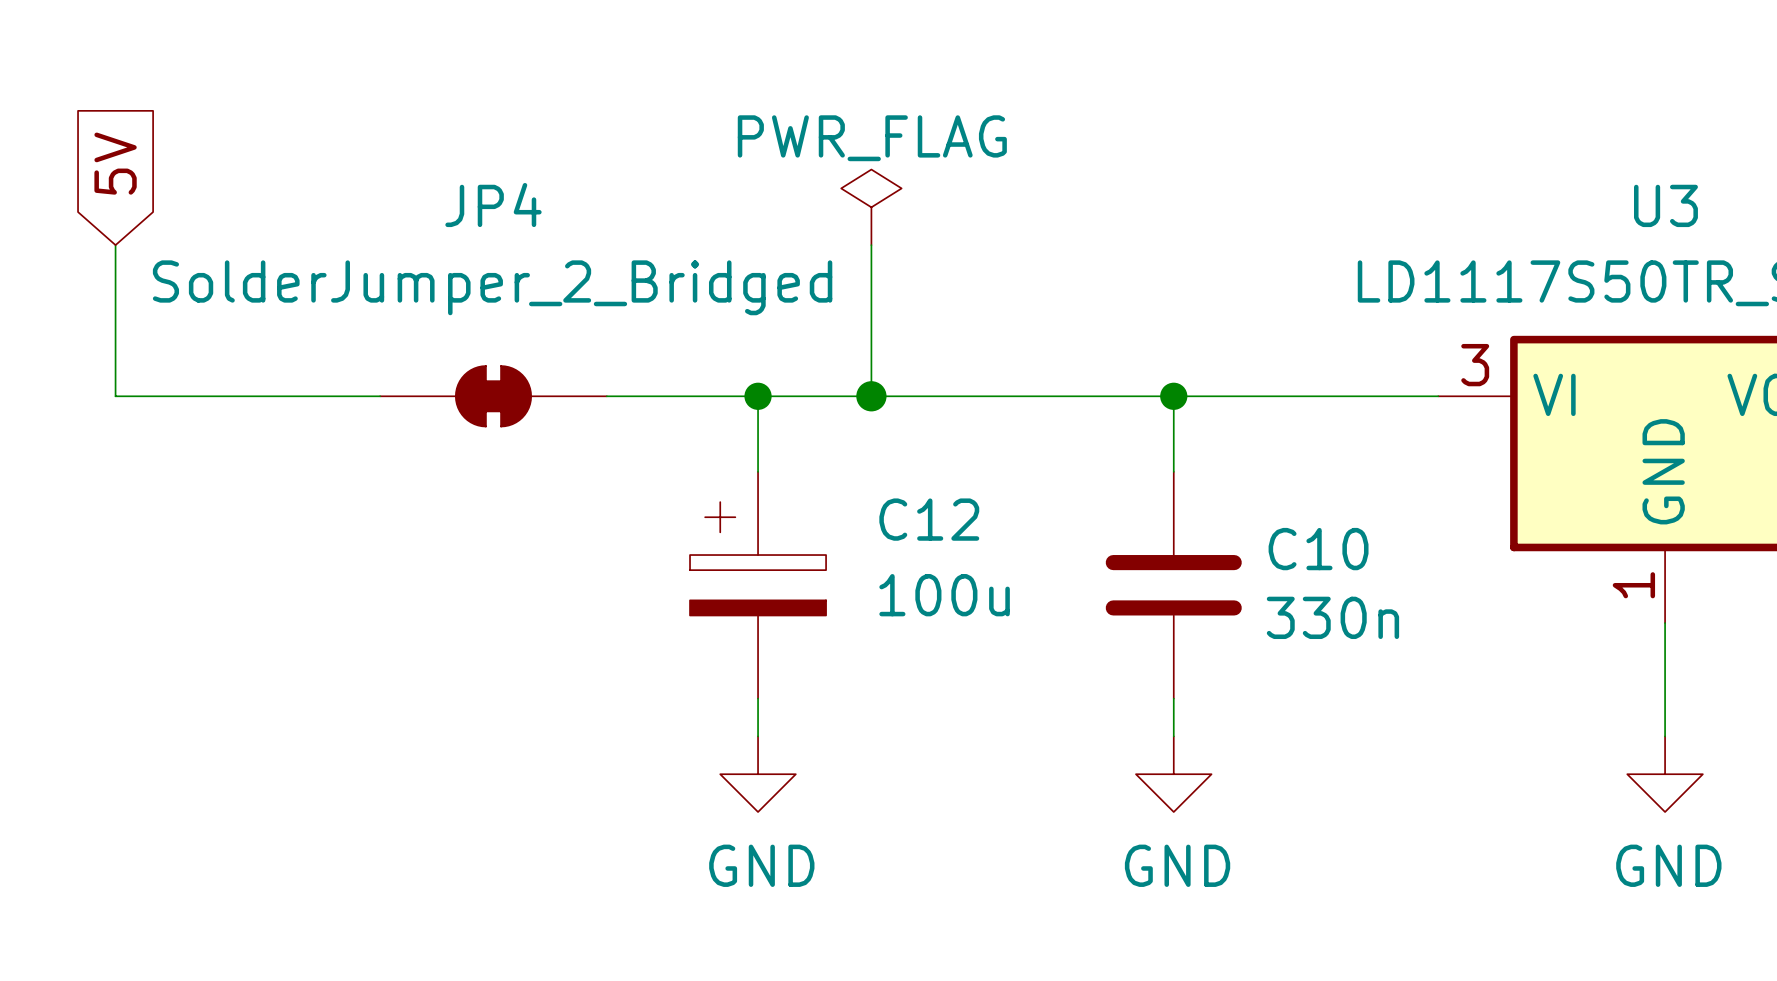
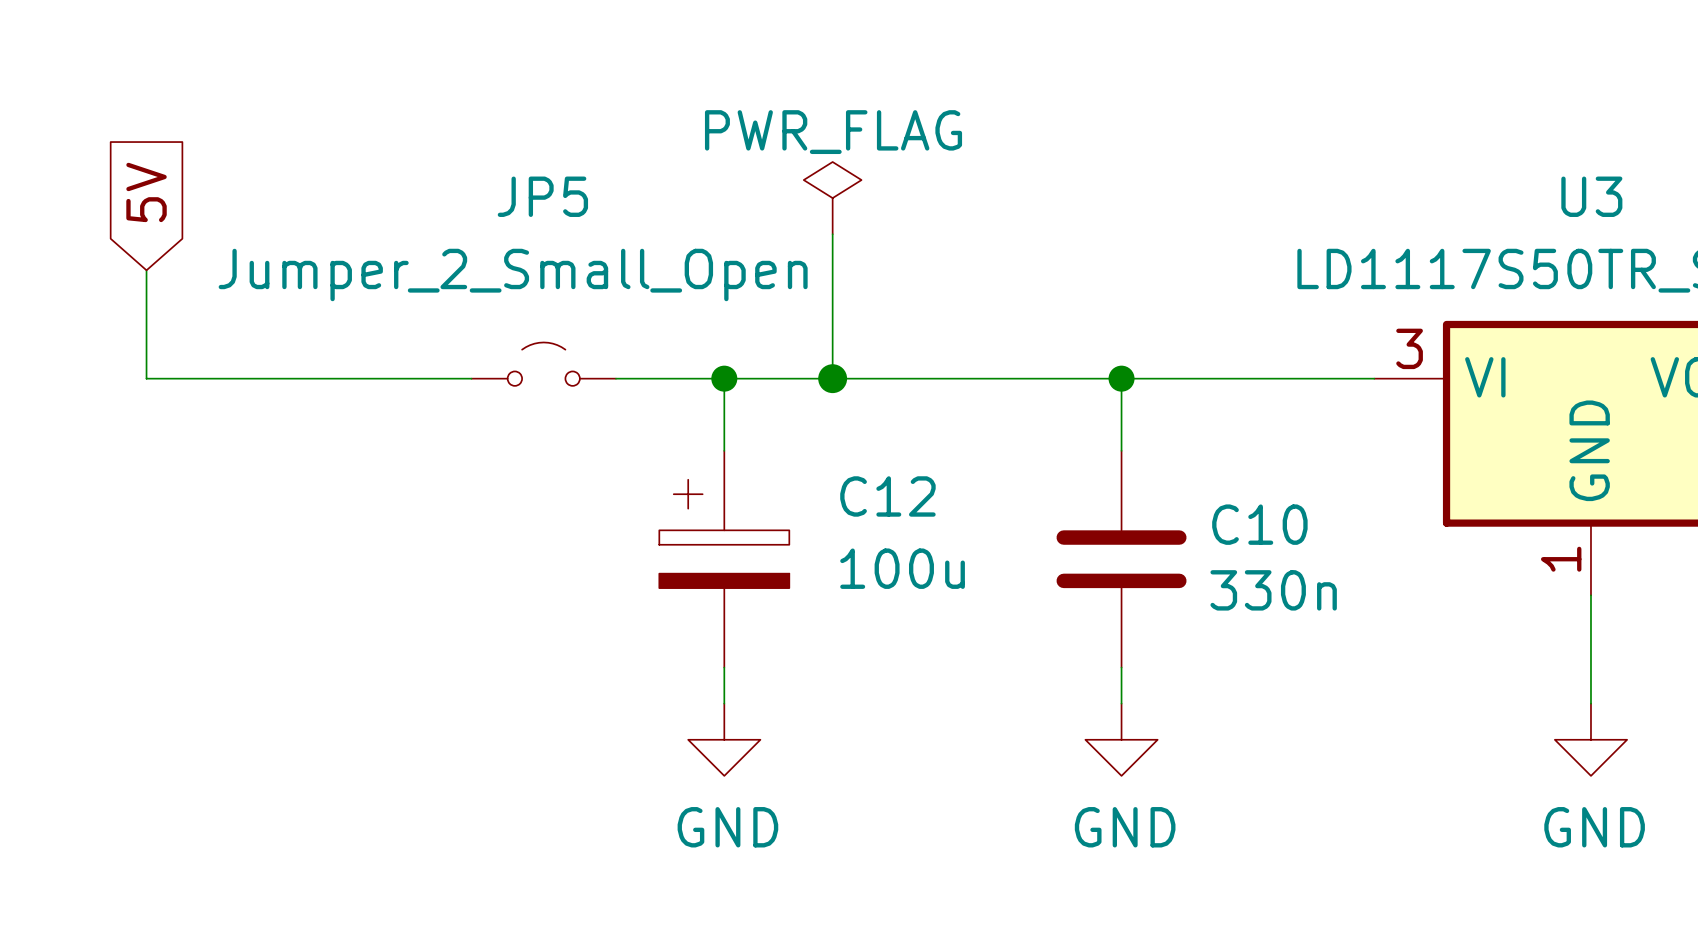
global label position: 5V (115, 163) -> 5V (146, 192)
wire: (115, 245) (115, 396) (153, 396) -> (146, 270) (146, 378)
JP5: none -> Jumper_2_Small_Open (543, 364)
JP4: SolderJumper_2_Bridged (493, 396) -> none

